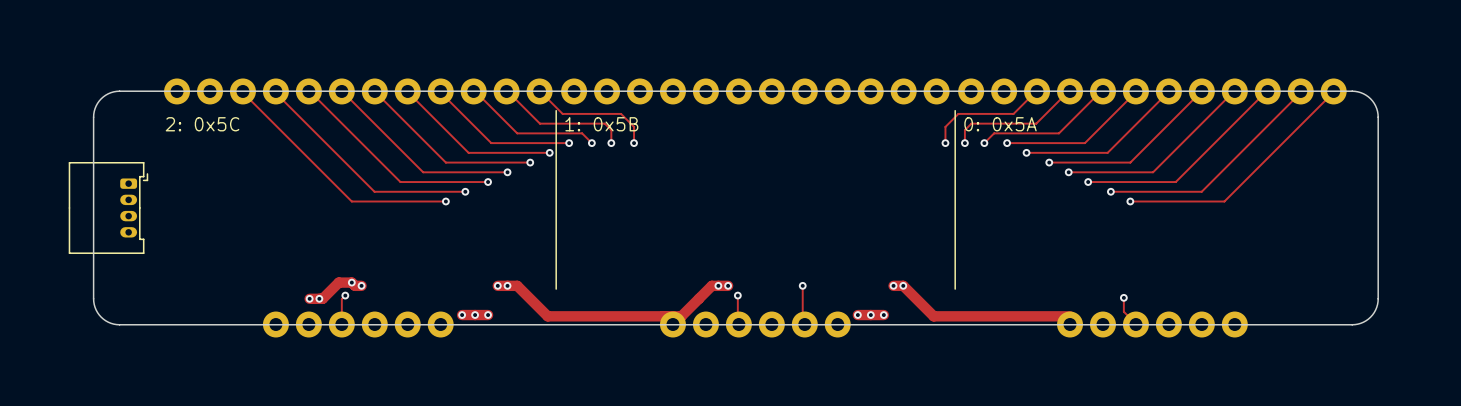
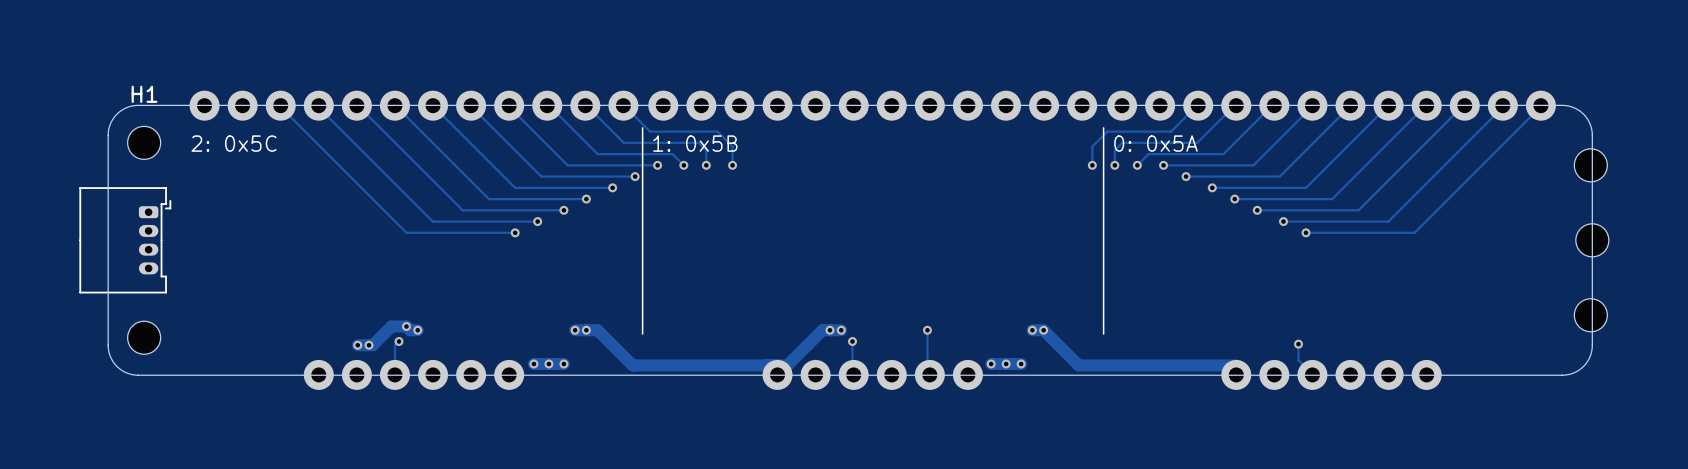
H1: none -> (144, 142)
part: none -> (1590, 165)
part: none -> (1592, 240)
part: none -> (1590, 315)
part: none -> (144, 337)

